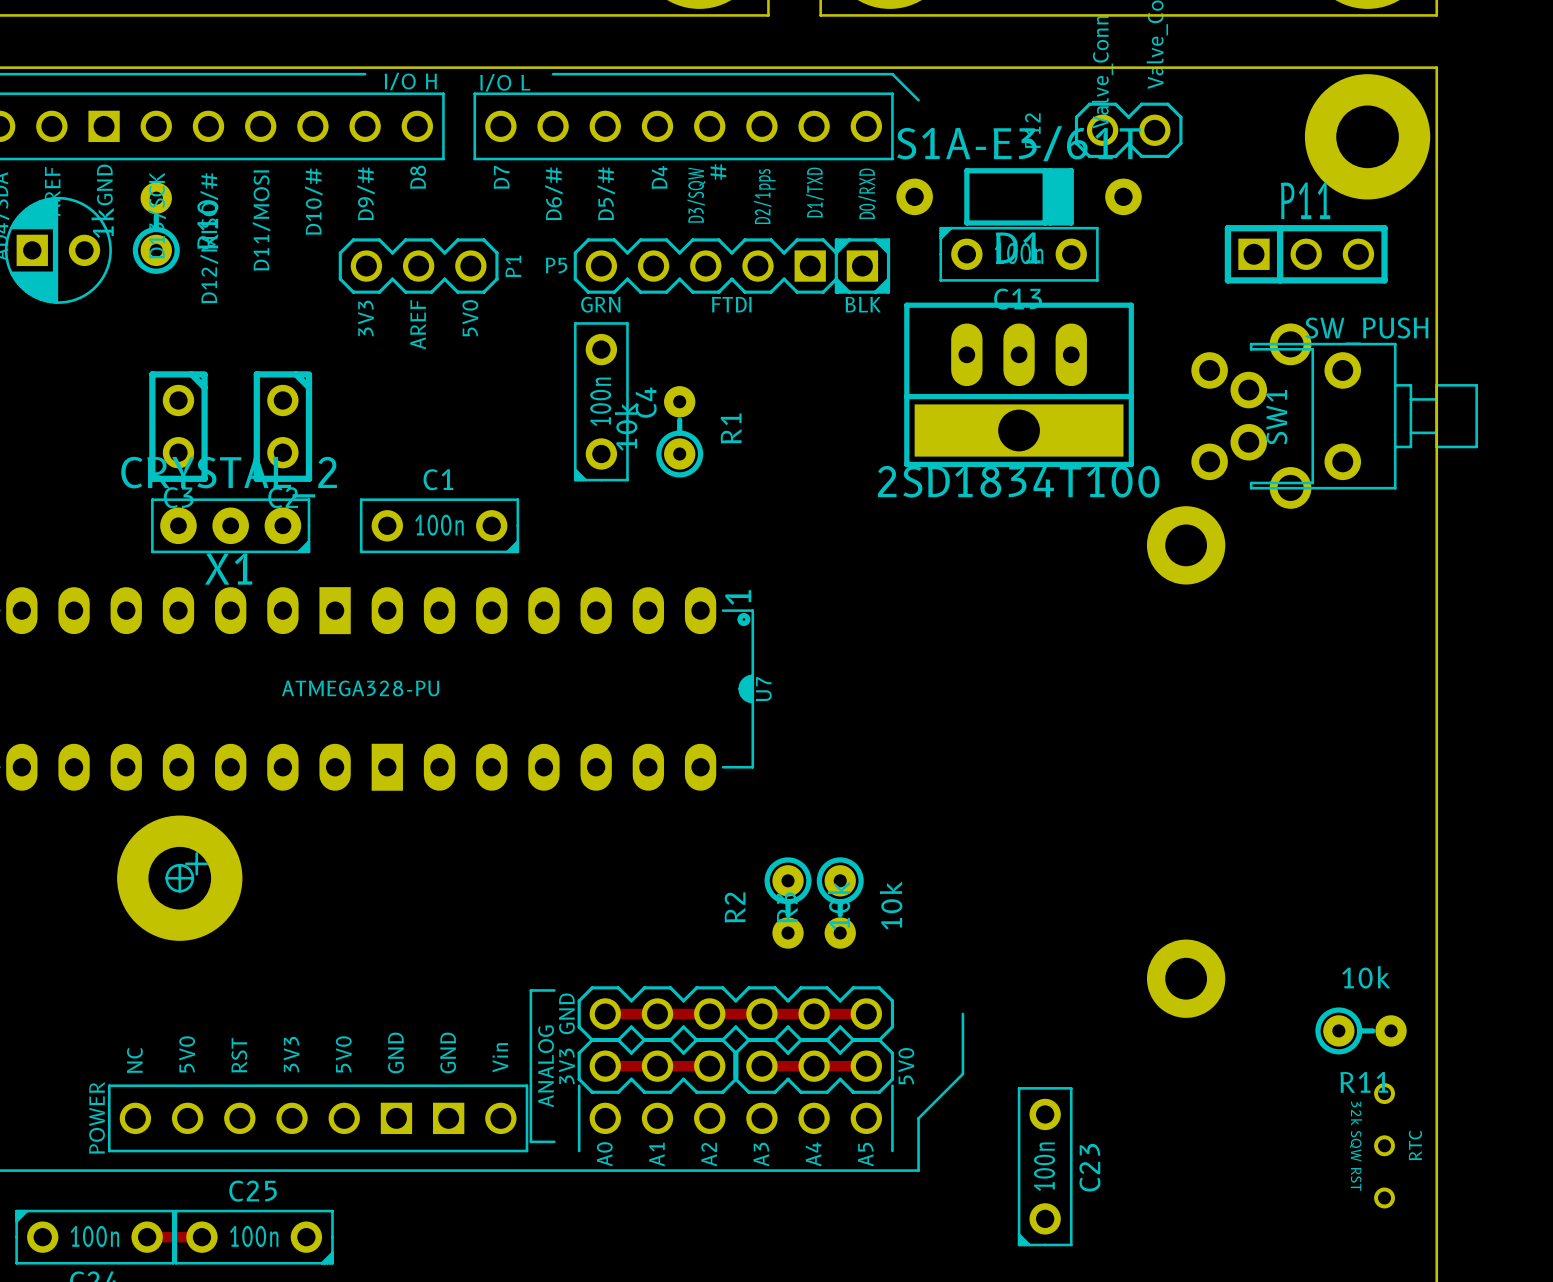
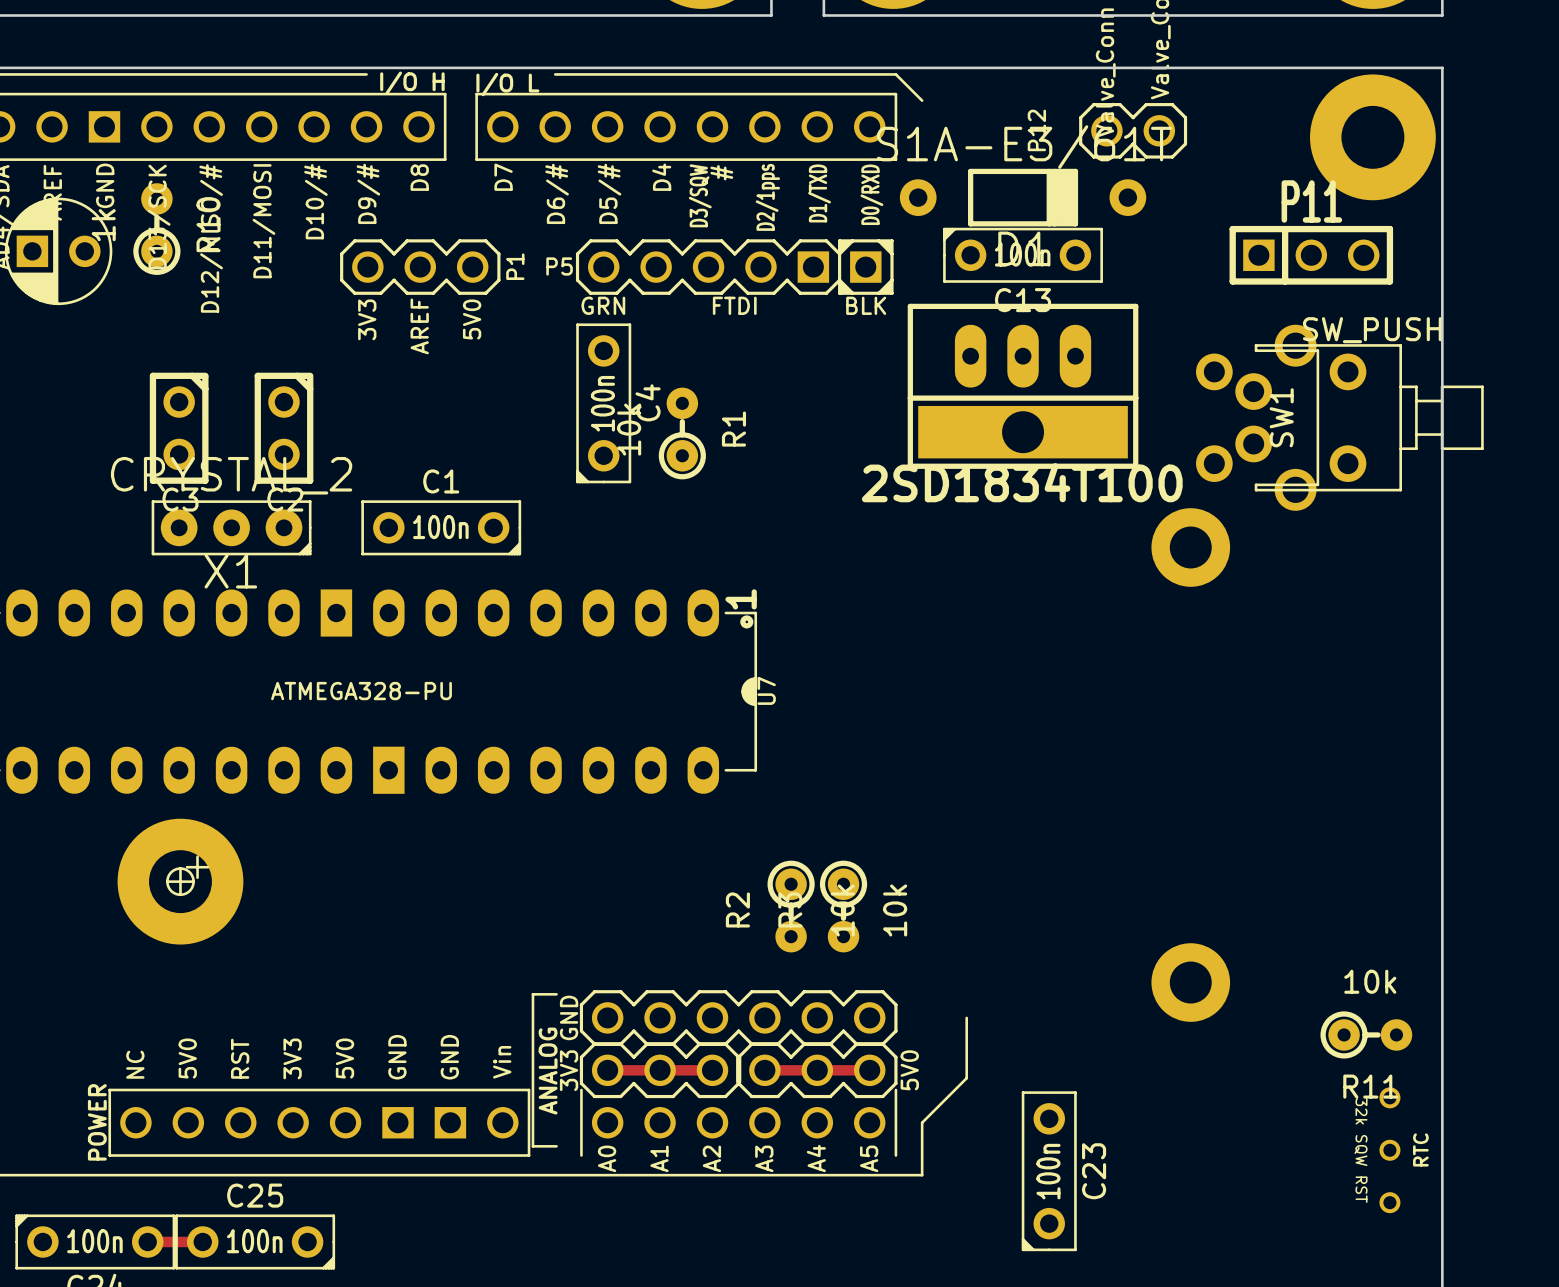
track: (605, 1013) (866, 1013) -> none

